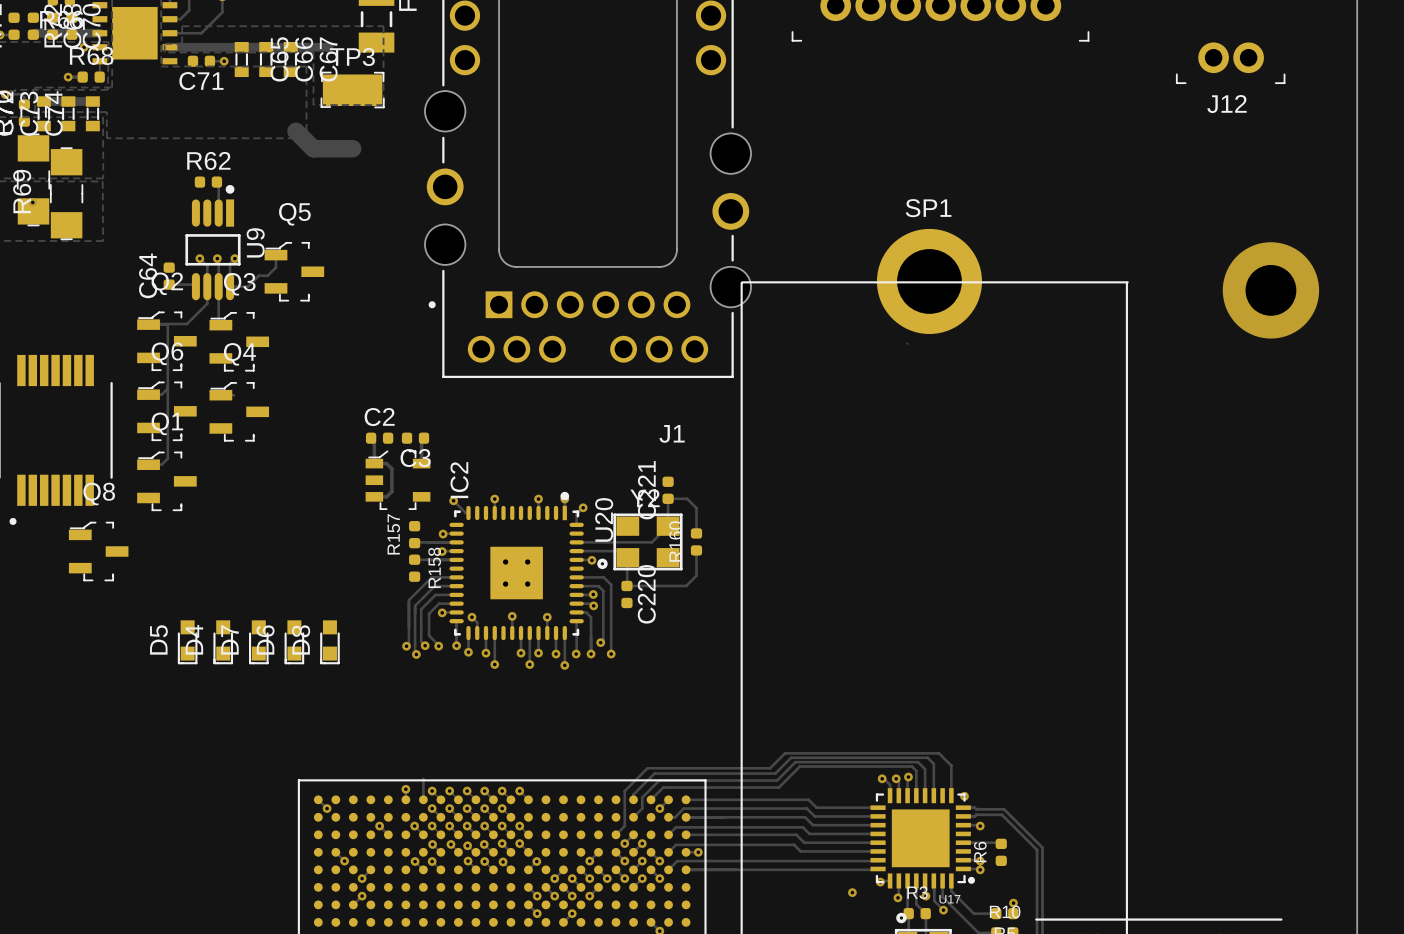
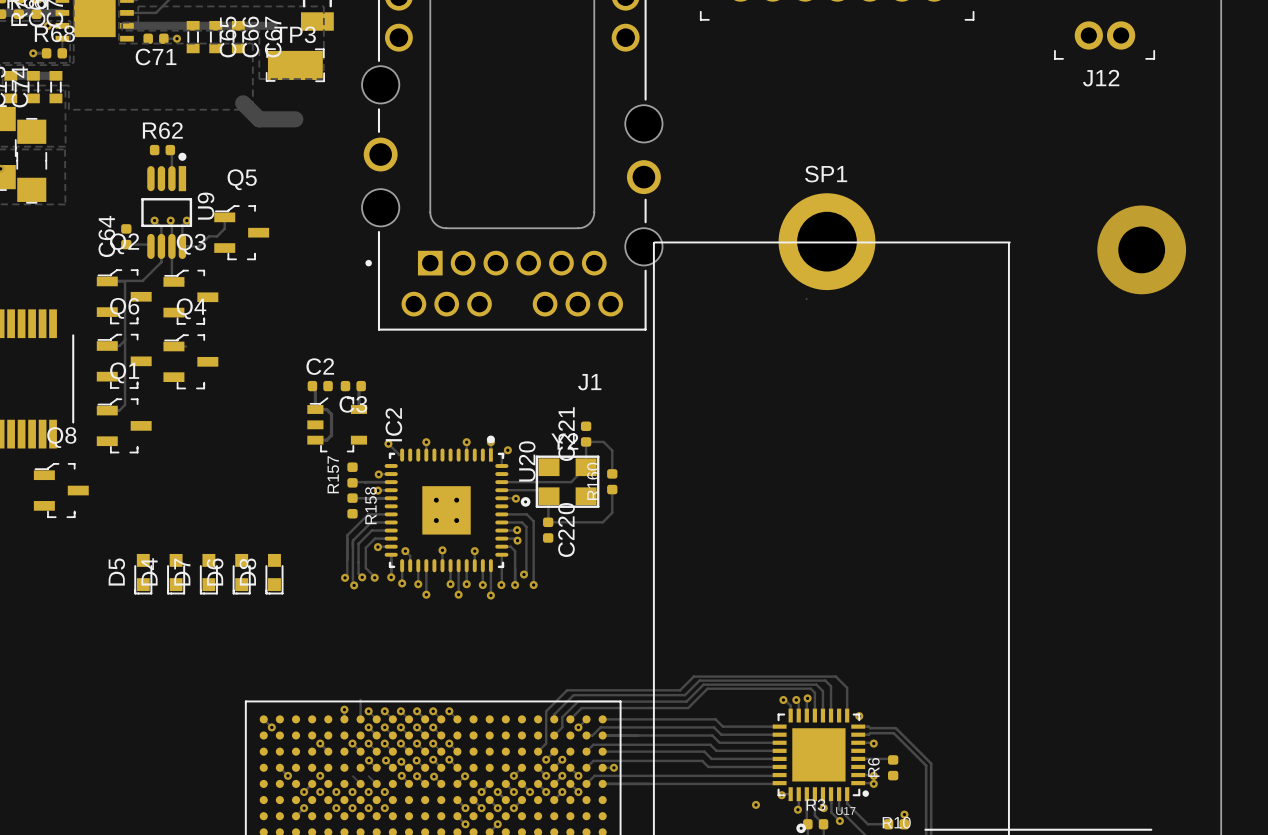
via: none -> (320, 775)
via: (415, 861) -> none
via: (432, 861) -> none
via: none -> (320, 791)
via: none -> (336, 791)
via: none -> (352, 791)
via: none -> (368, 791)
via: none -> (384, 791)
via: none -> (336, 808)
via: none -> (352, 808)
via: none -> (368, 808)
via: none -> (384, 808)

